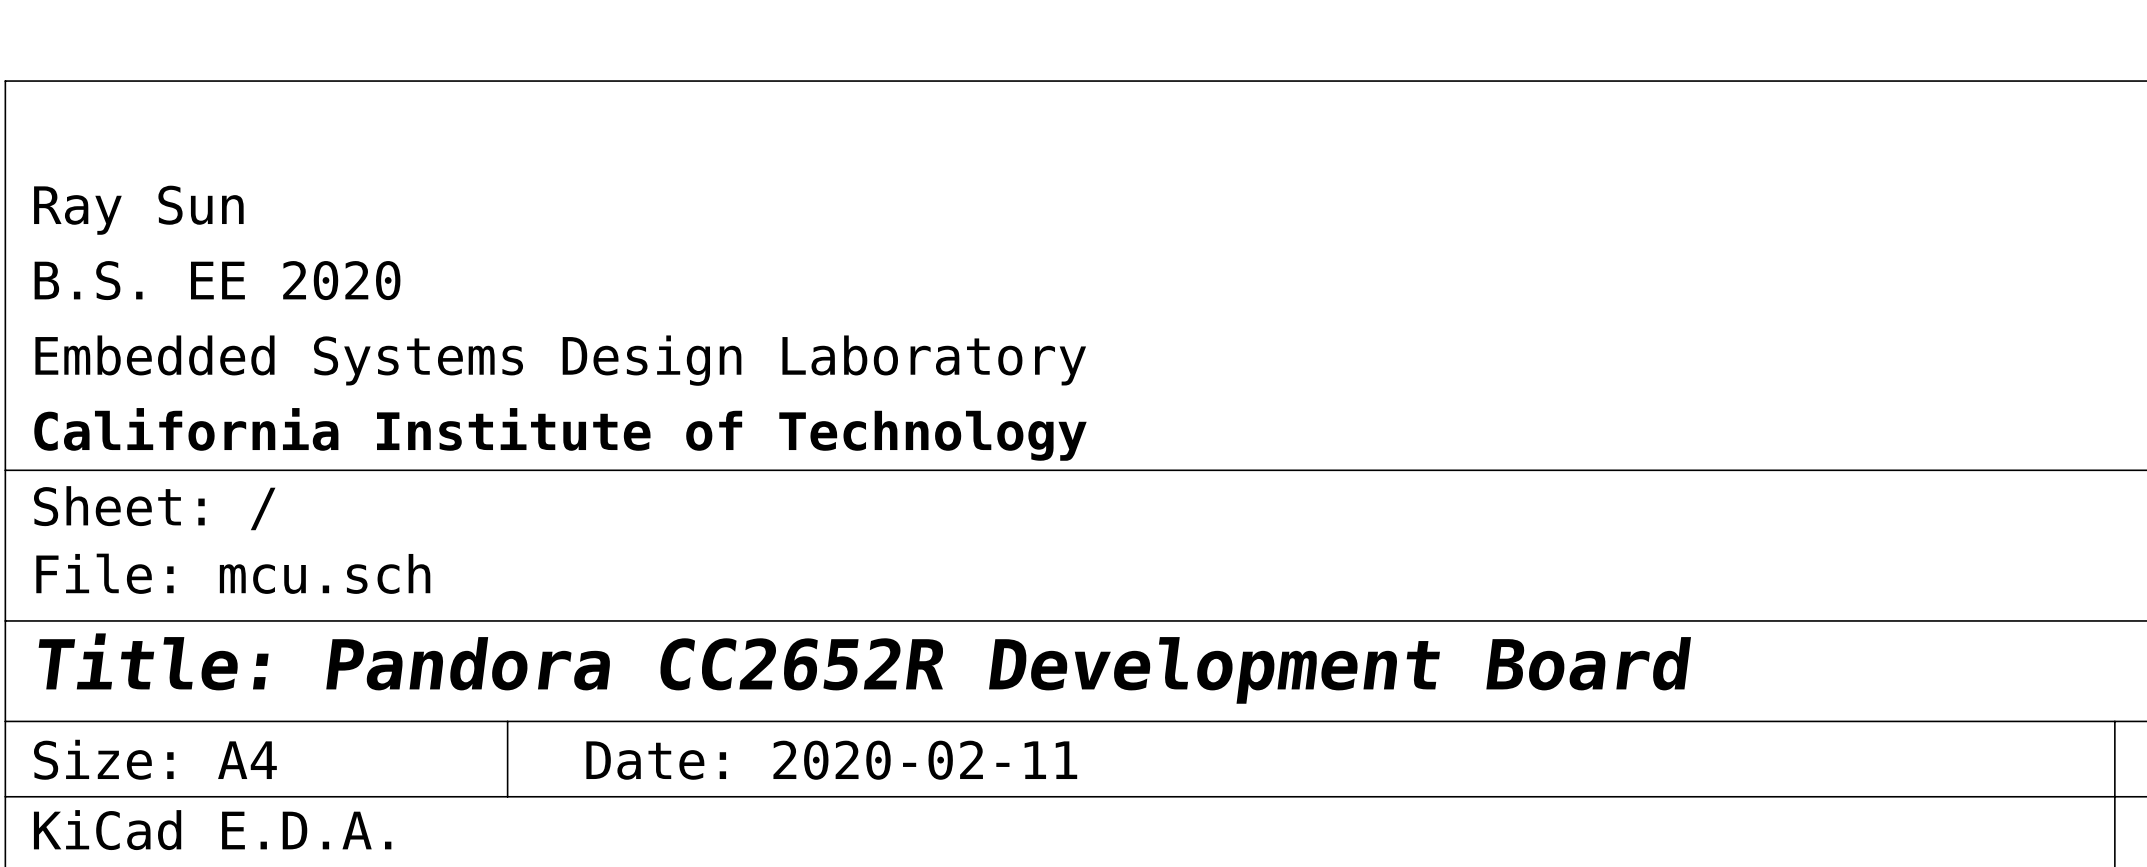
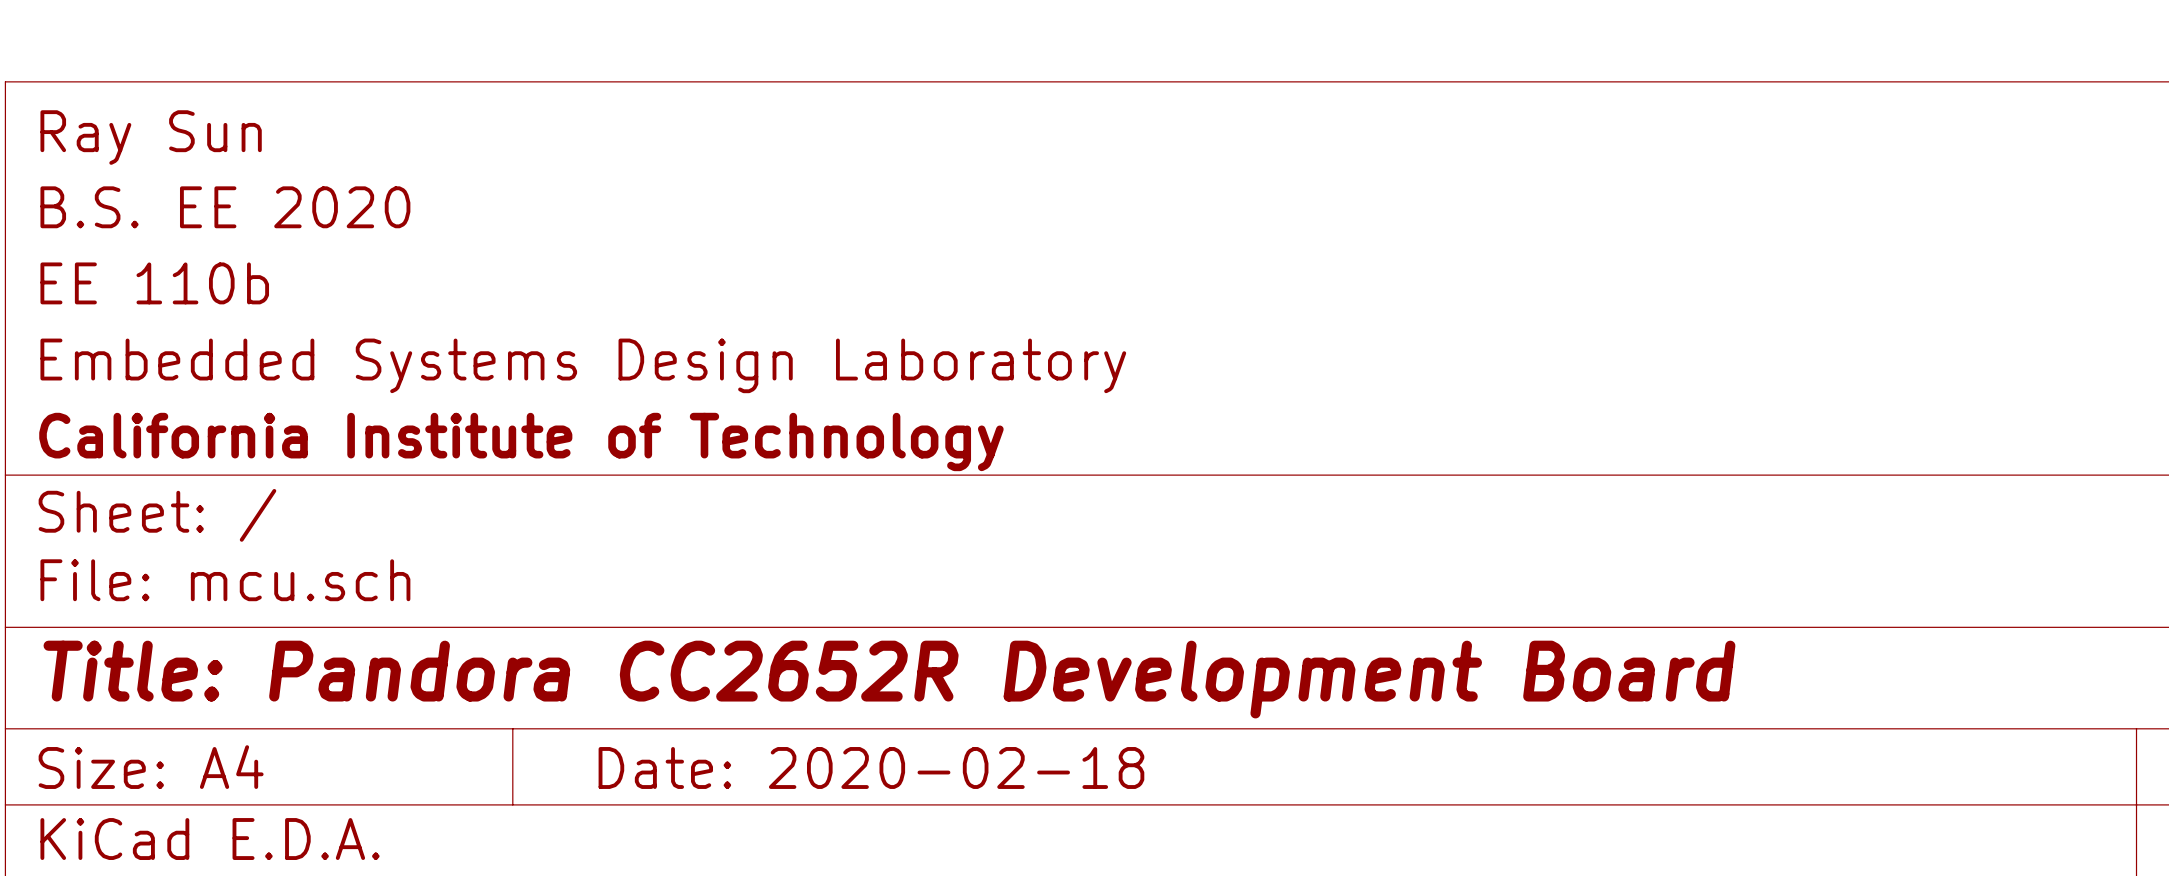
title block: none -> Ray Sun (151, 137)
title block: Ray Sun (138, 210) -> B.S. EE 2020 (225, 207)
title block: B.S. EE 2020 (217, 280) -> EE 110b (154, 283)
title block: Date: 2020-02-11 (831, 760) -> Date: 2020-02-18 (871, 767)

